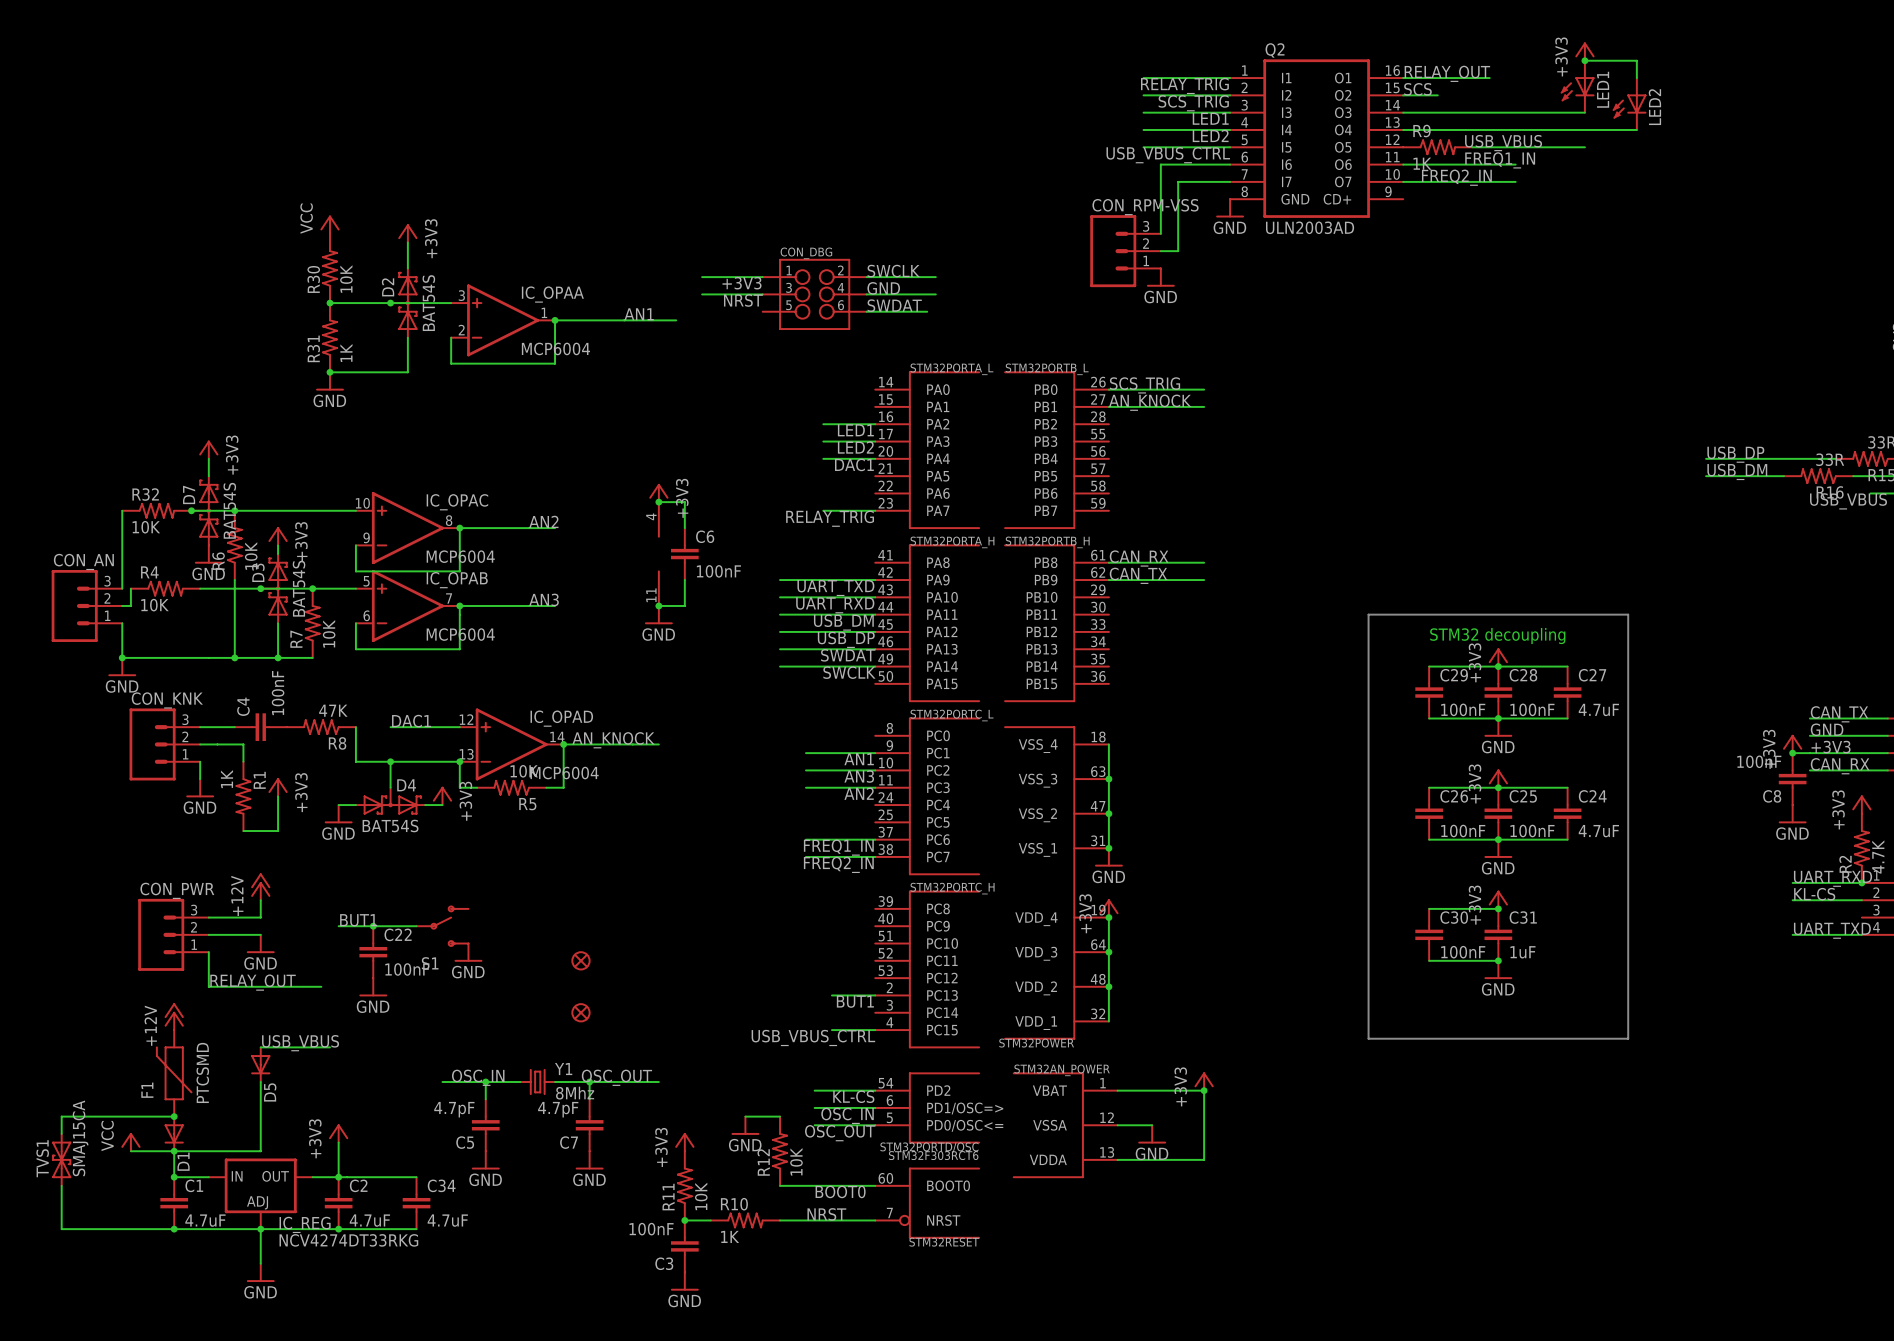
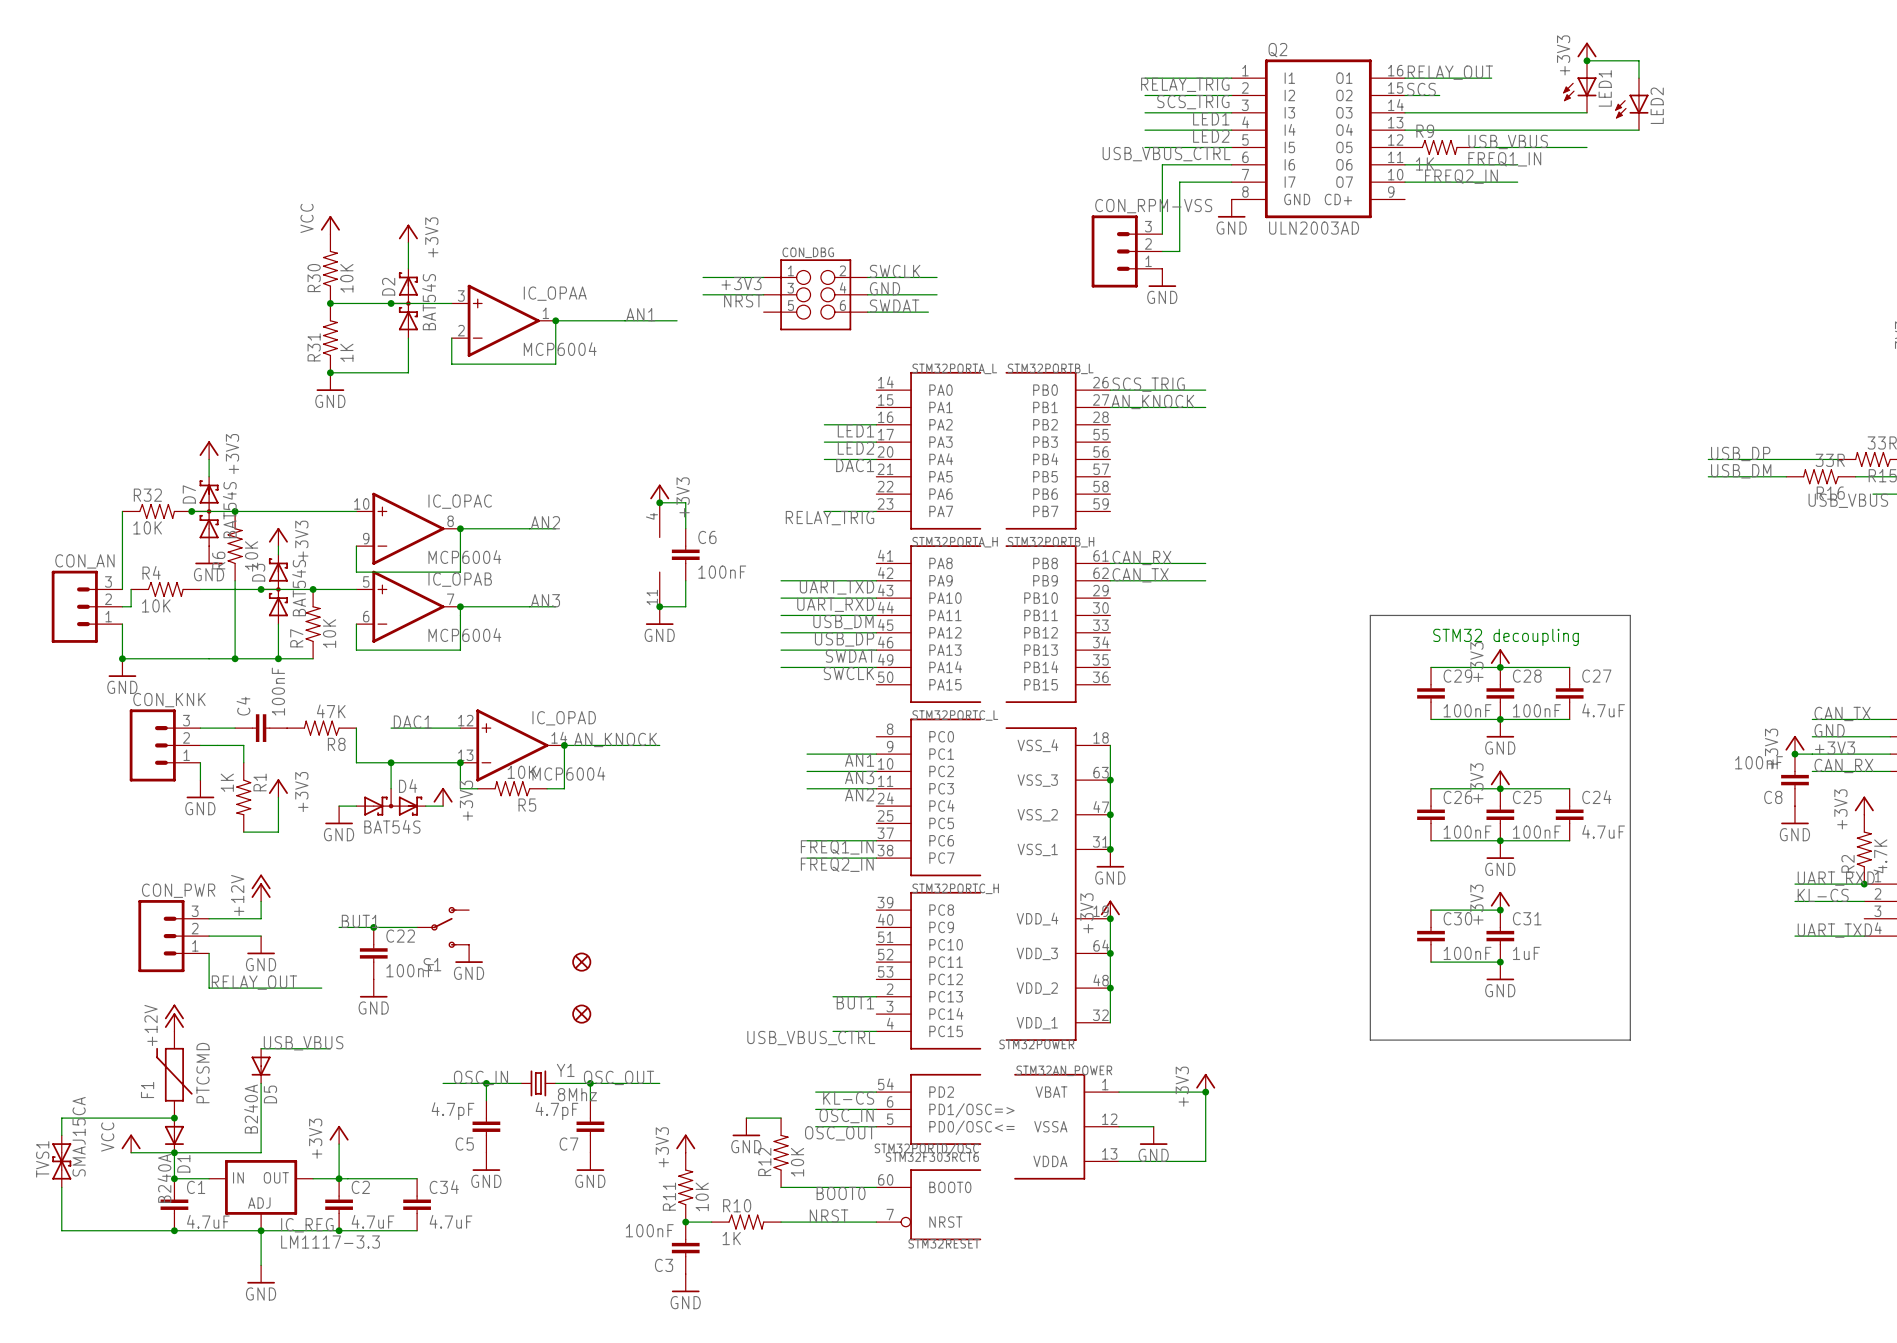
D5 value: none -> B240A (251, 1109)
D1 value: none -> B240A (164, 1178)
IC_REG value: NCV4274DT33RKG (348, 1240) -> LM1117-3.3 (330, 1242)

